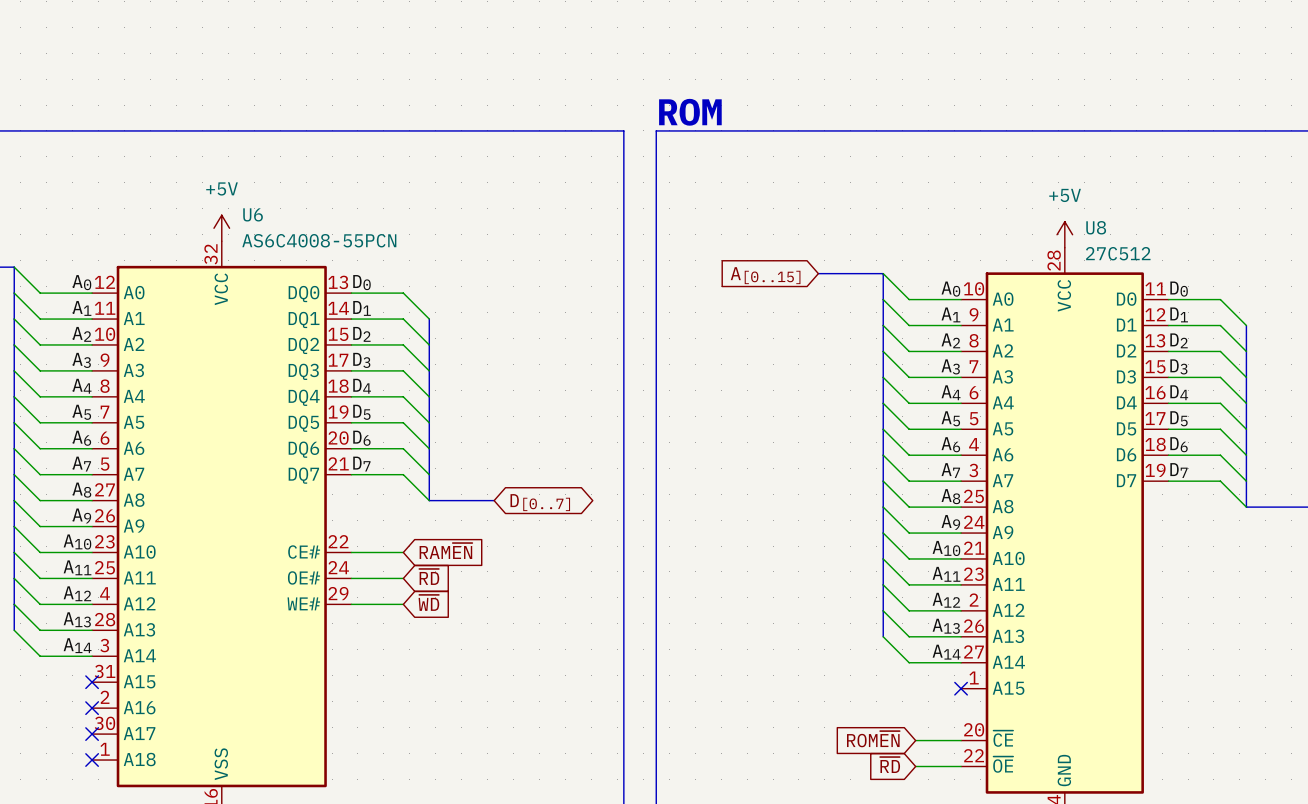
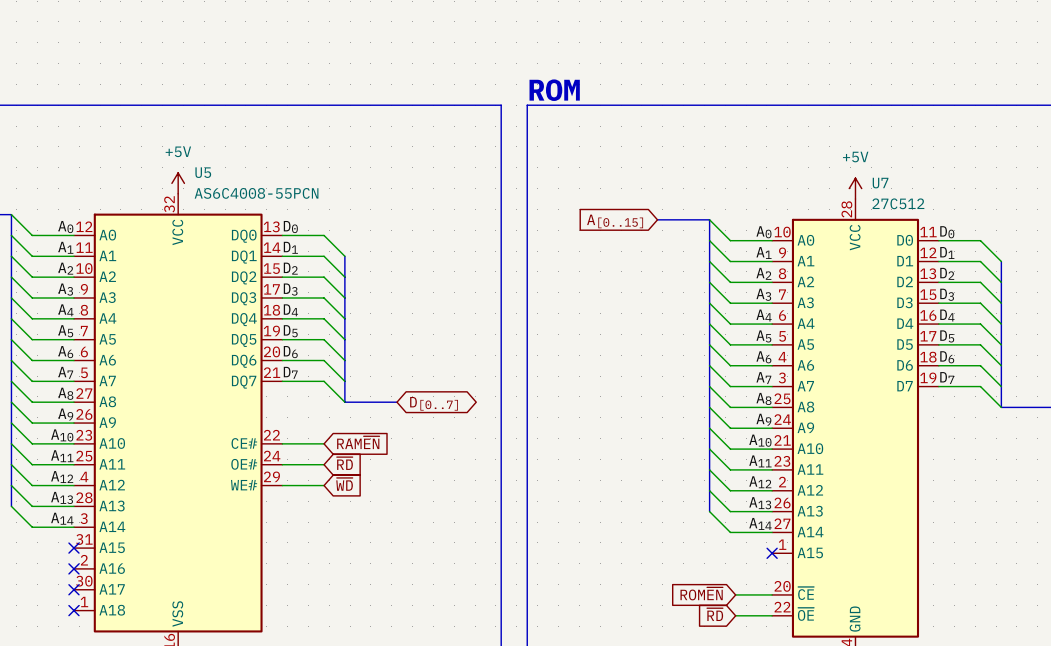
U6 name: U6 (253, 214) -> U5 (203, 172)
U8 name: U8 (1096, 227) -> U7 (880, 183)

